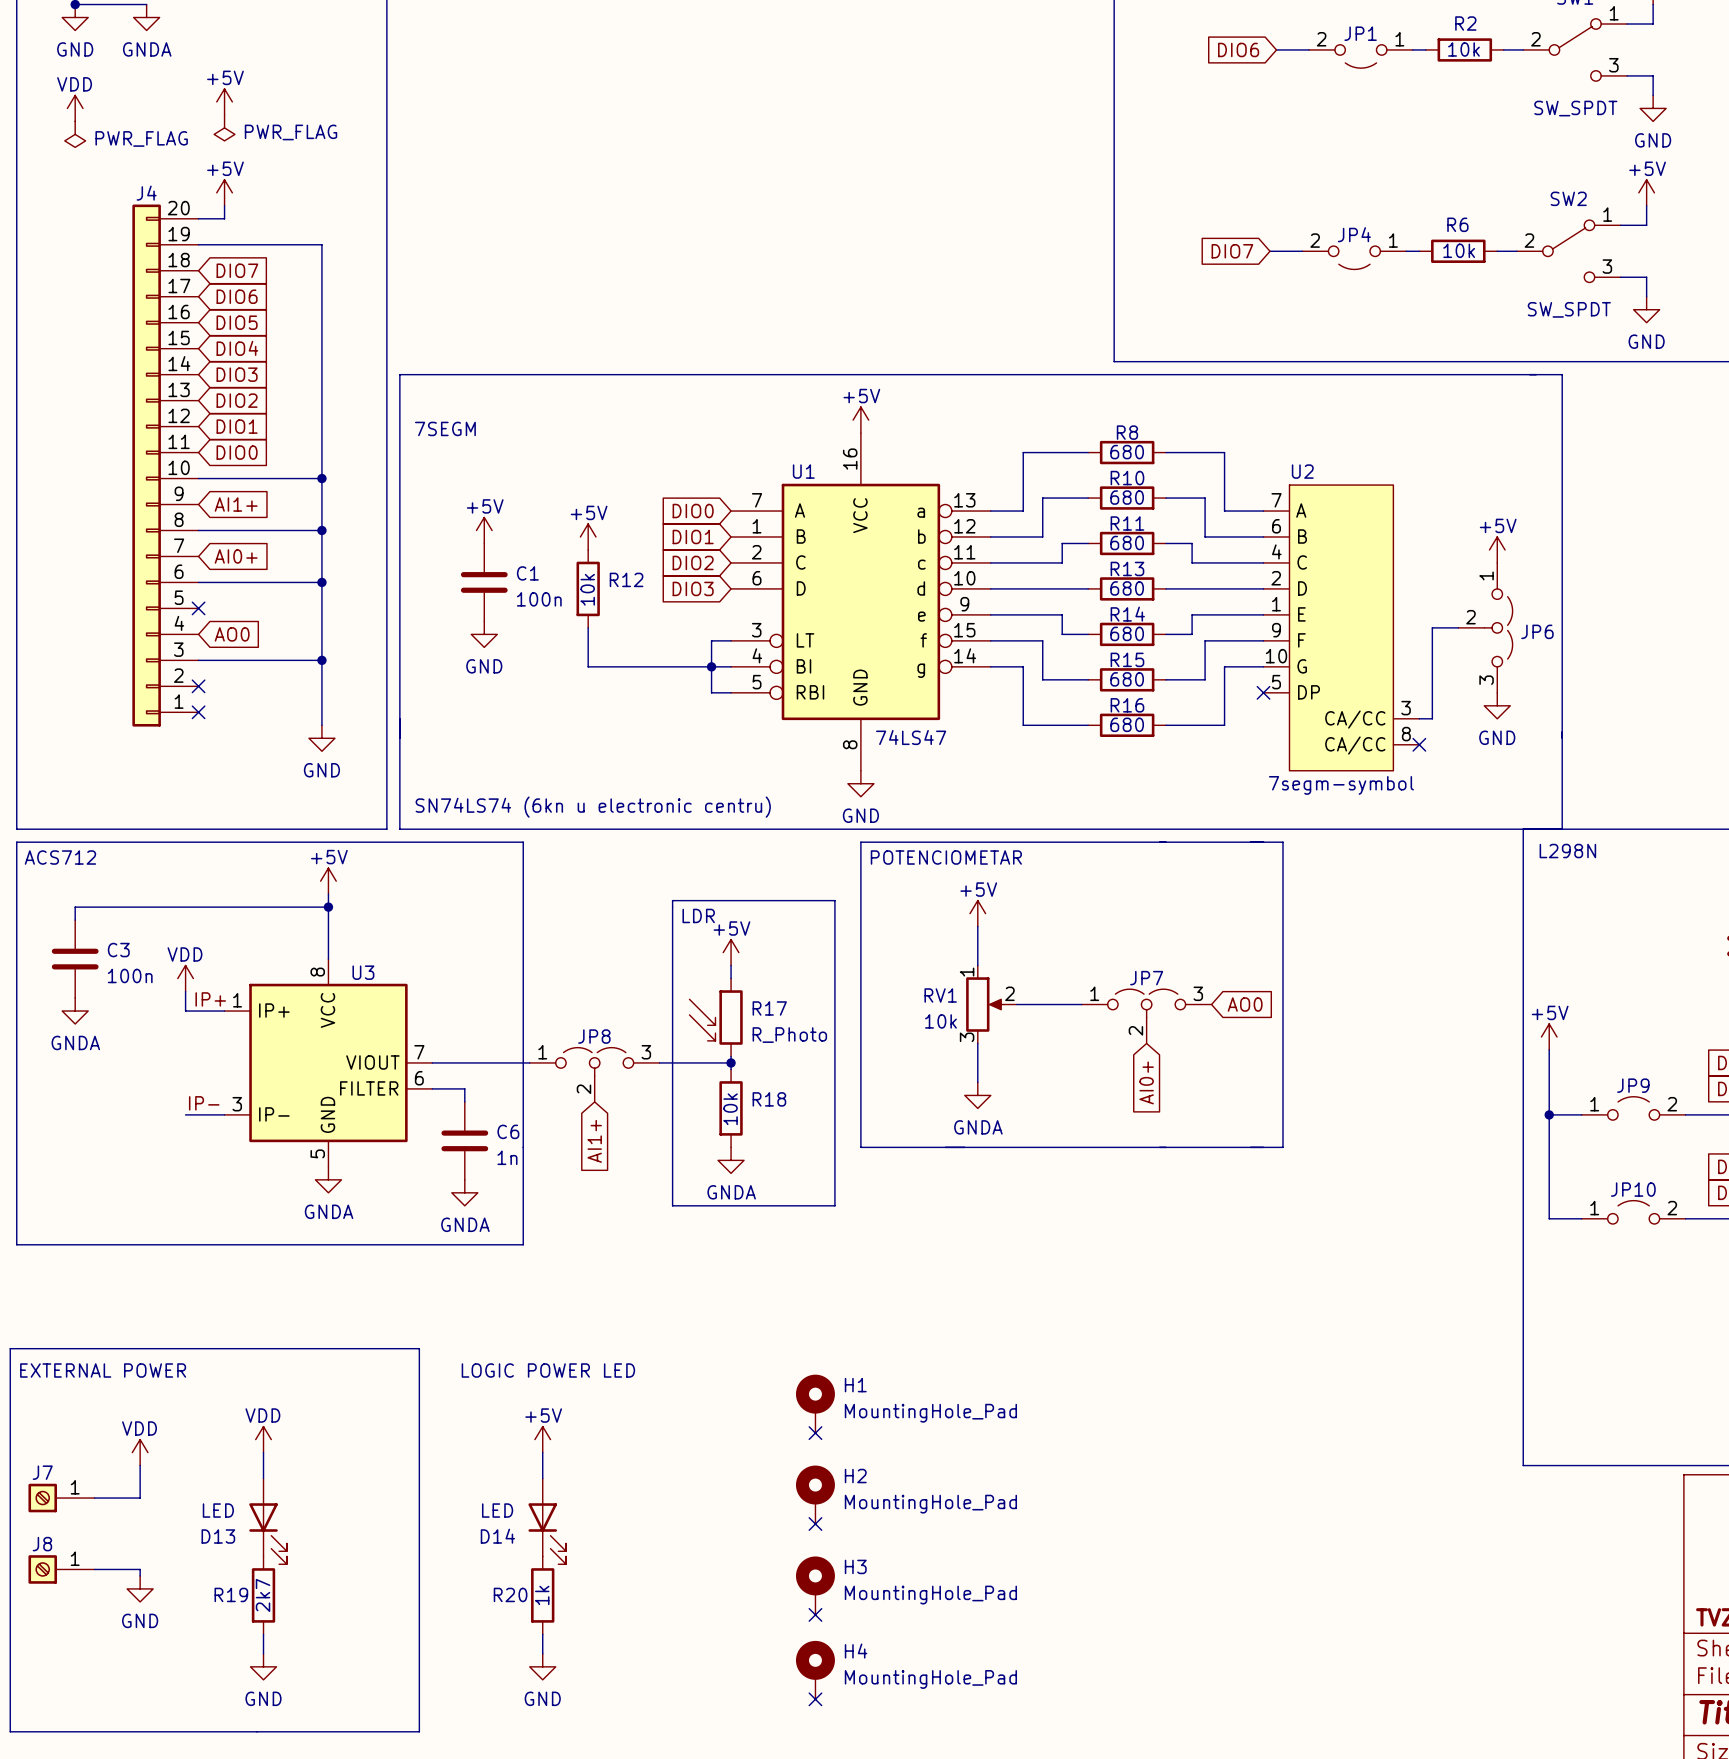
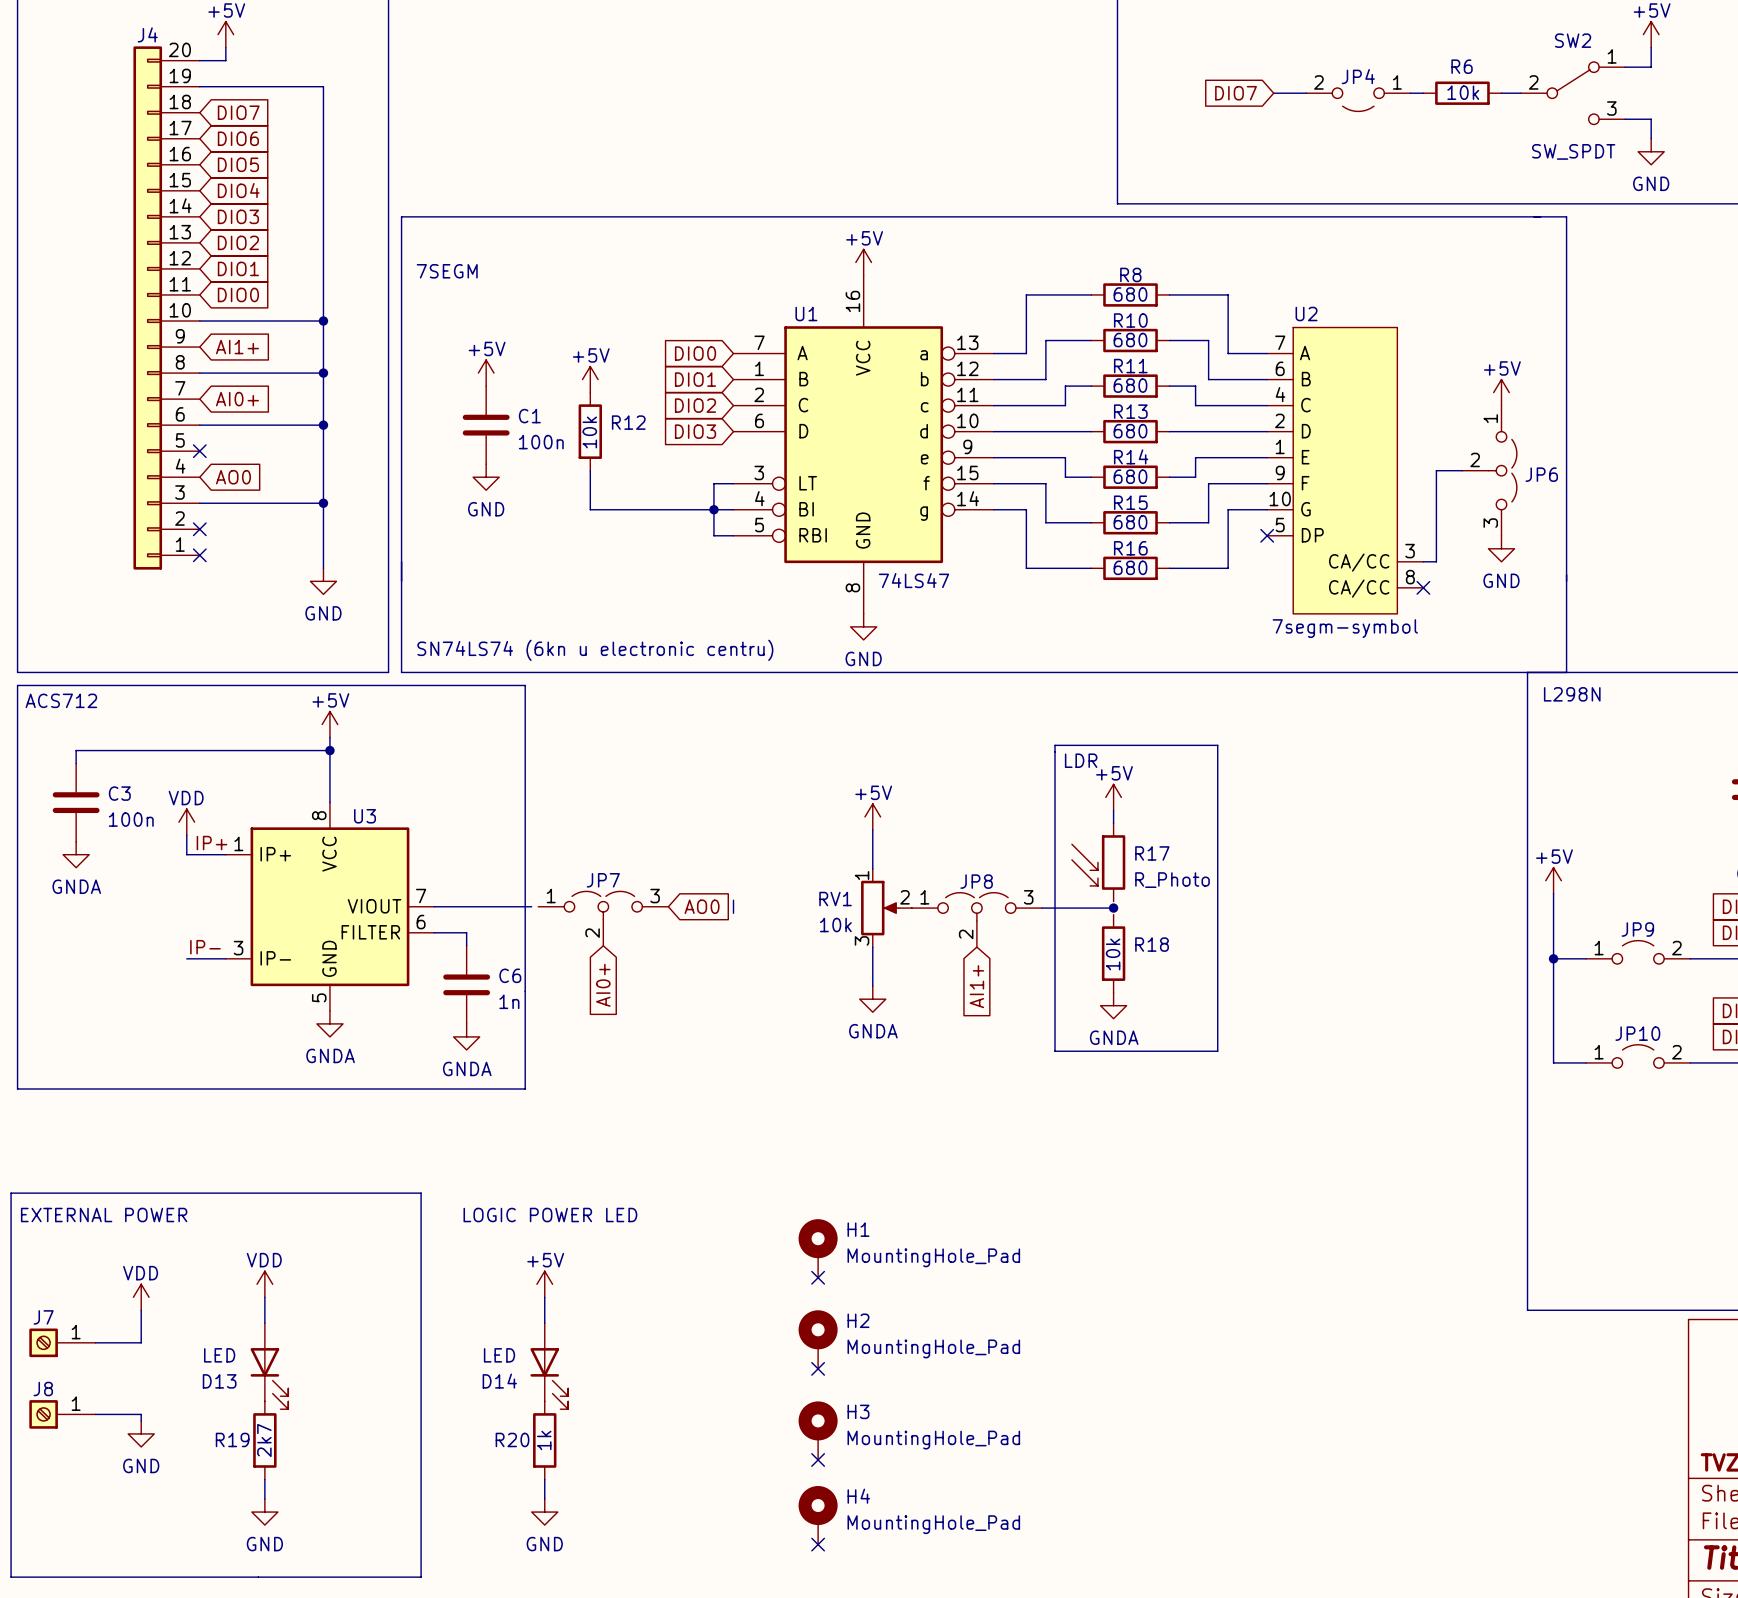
line: (860, 842) (1282, 842) (1282, 1147) (860, 1147) (860, 842) -> none
text: POTENCIOMETAR (946, 857) -> none
line: (672, 900) (672, 1205) (834, 1205) (834, 900) (672, 900) -> none
line: none -> (1055, 745) (1055, 1051) (1217, 1051) (1217, 745) (1055, 745)
power symbol: +5V (977, 913) -> none
text: LDR (698, 915) -> none
text: none -> LDR (1081, 760)
wire: (977, 926) (977, 965) -> (872, 829) (872, 869)
power symbol: +5V (731, 952) -> none
power symbol: none -> +5V (1113, 797)
wire: (731, 965) (731, 978) -> none
wire: none -> (1113, 810) (1113, 823)
power symbol: none -> +5V (872, 816)
RV1 position: (991, 1004) -> (886, 908)
wire: (1016, 1004) (1081, 1004) -> none
global label: AO0 (1245, 1004) -> none
JP7 position: (1146, 1016) -> (603, 918)
R17 position: (716, 1017) -> (1098, 862)
wire: (977, 1043) (977, 1082) -> (872, 947) (872, 986)
wire: (659, 1062) (731, 1062) -> none
global label: none -> AO0 (702, 906)
junction: (731, 1062) -> none
wire: none -> (1041, 908) (1113, 908)
junction: none -> (1113, 908)
JP8 position: (594, 1074) -> (976, 919)
global label: AI0+ (1146, 1082) -> none
power symbol: GNDA (977, 1095) -> none
R18 position: (731, 1108) -> (1113, 953)
global label: AI1+ (594, 1141) -> AI0+ (603, 985)
global label: none -> AI1+ (976, 986)
power symbol: none -> GNDA (872, 999)
power symbol: GNDA (731, 1160) -> none
power symbol: none -> GNDA (1113, 1005)

